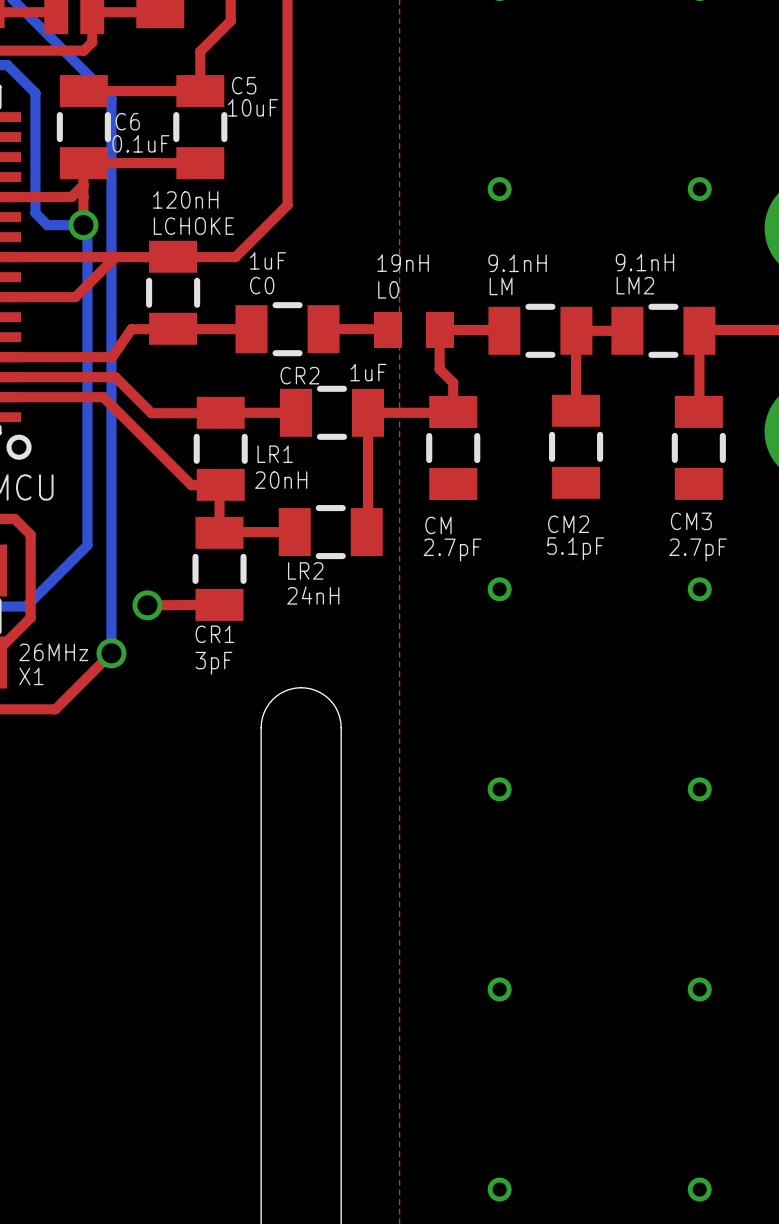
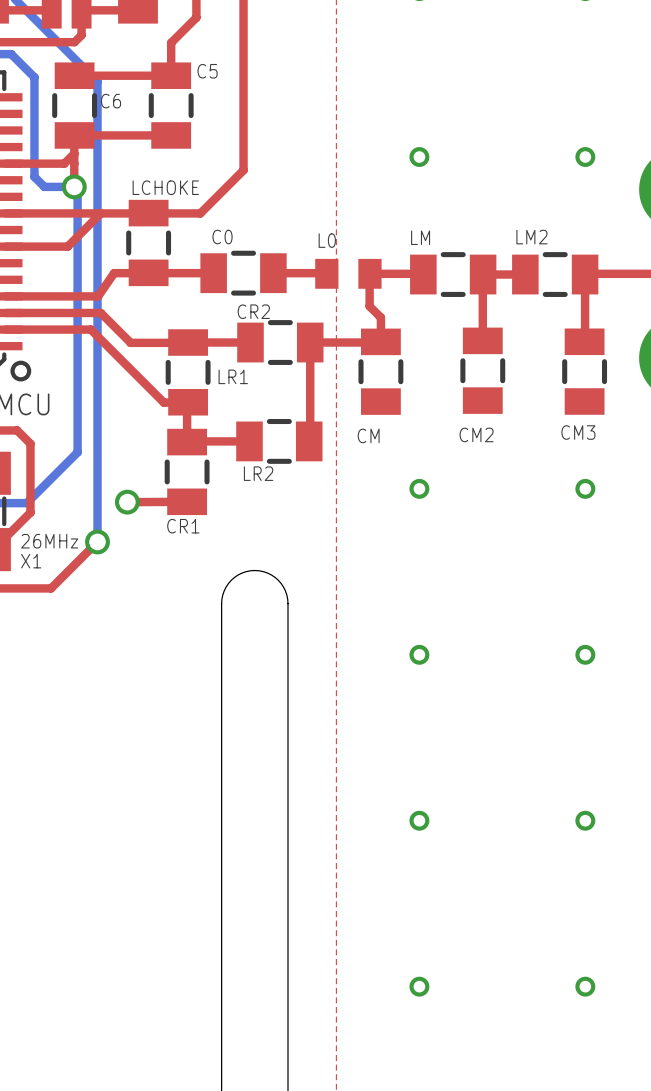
C5 value: 10uF (252, 107) -> none
C6 value: 0.1uF (140, 143) -> none
LCHOKE value: 120nH (185, 199) -> none
C0 value: 1uF (267, 260) -> none
LM2 value: 9.1nH (644, 262) -> none
L0 value: 19nH (403, 263) -> none
LM value: 9.1nH (517, 263) -> none
CR2 value: 1uF (368, 372) -> none
LR1 value: 20nH (281, 480) -> none
CM2 value: 5.1pF (575, 548) -> none
CM3 value: 2.7pF (698, 549) -> none
CM value: 2.7pF (452, 550) -> none
LR2 value: 24nH (313, 595) -> none
CR1 value: 3pF (213, 663) -> none

